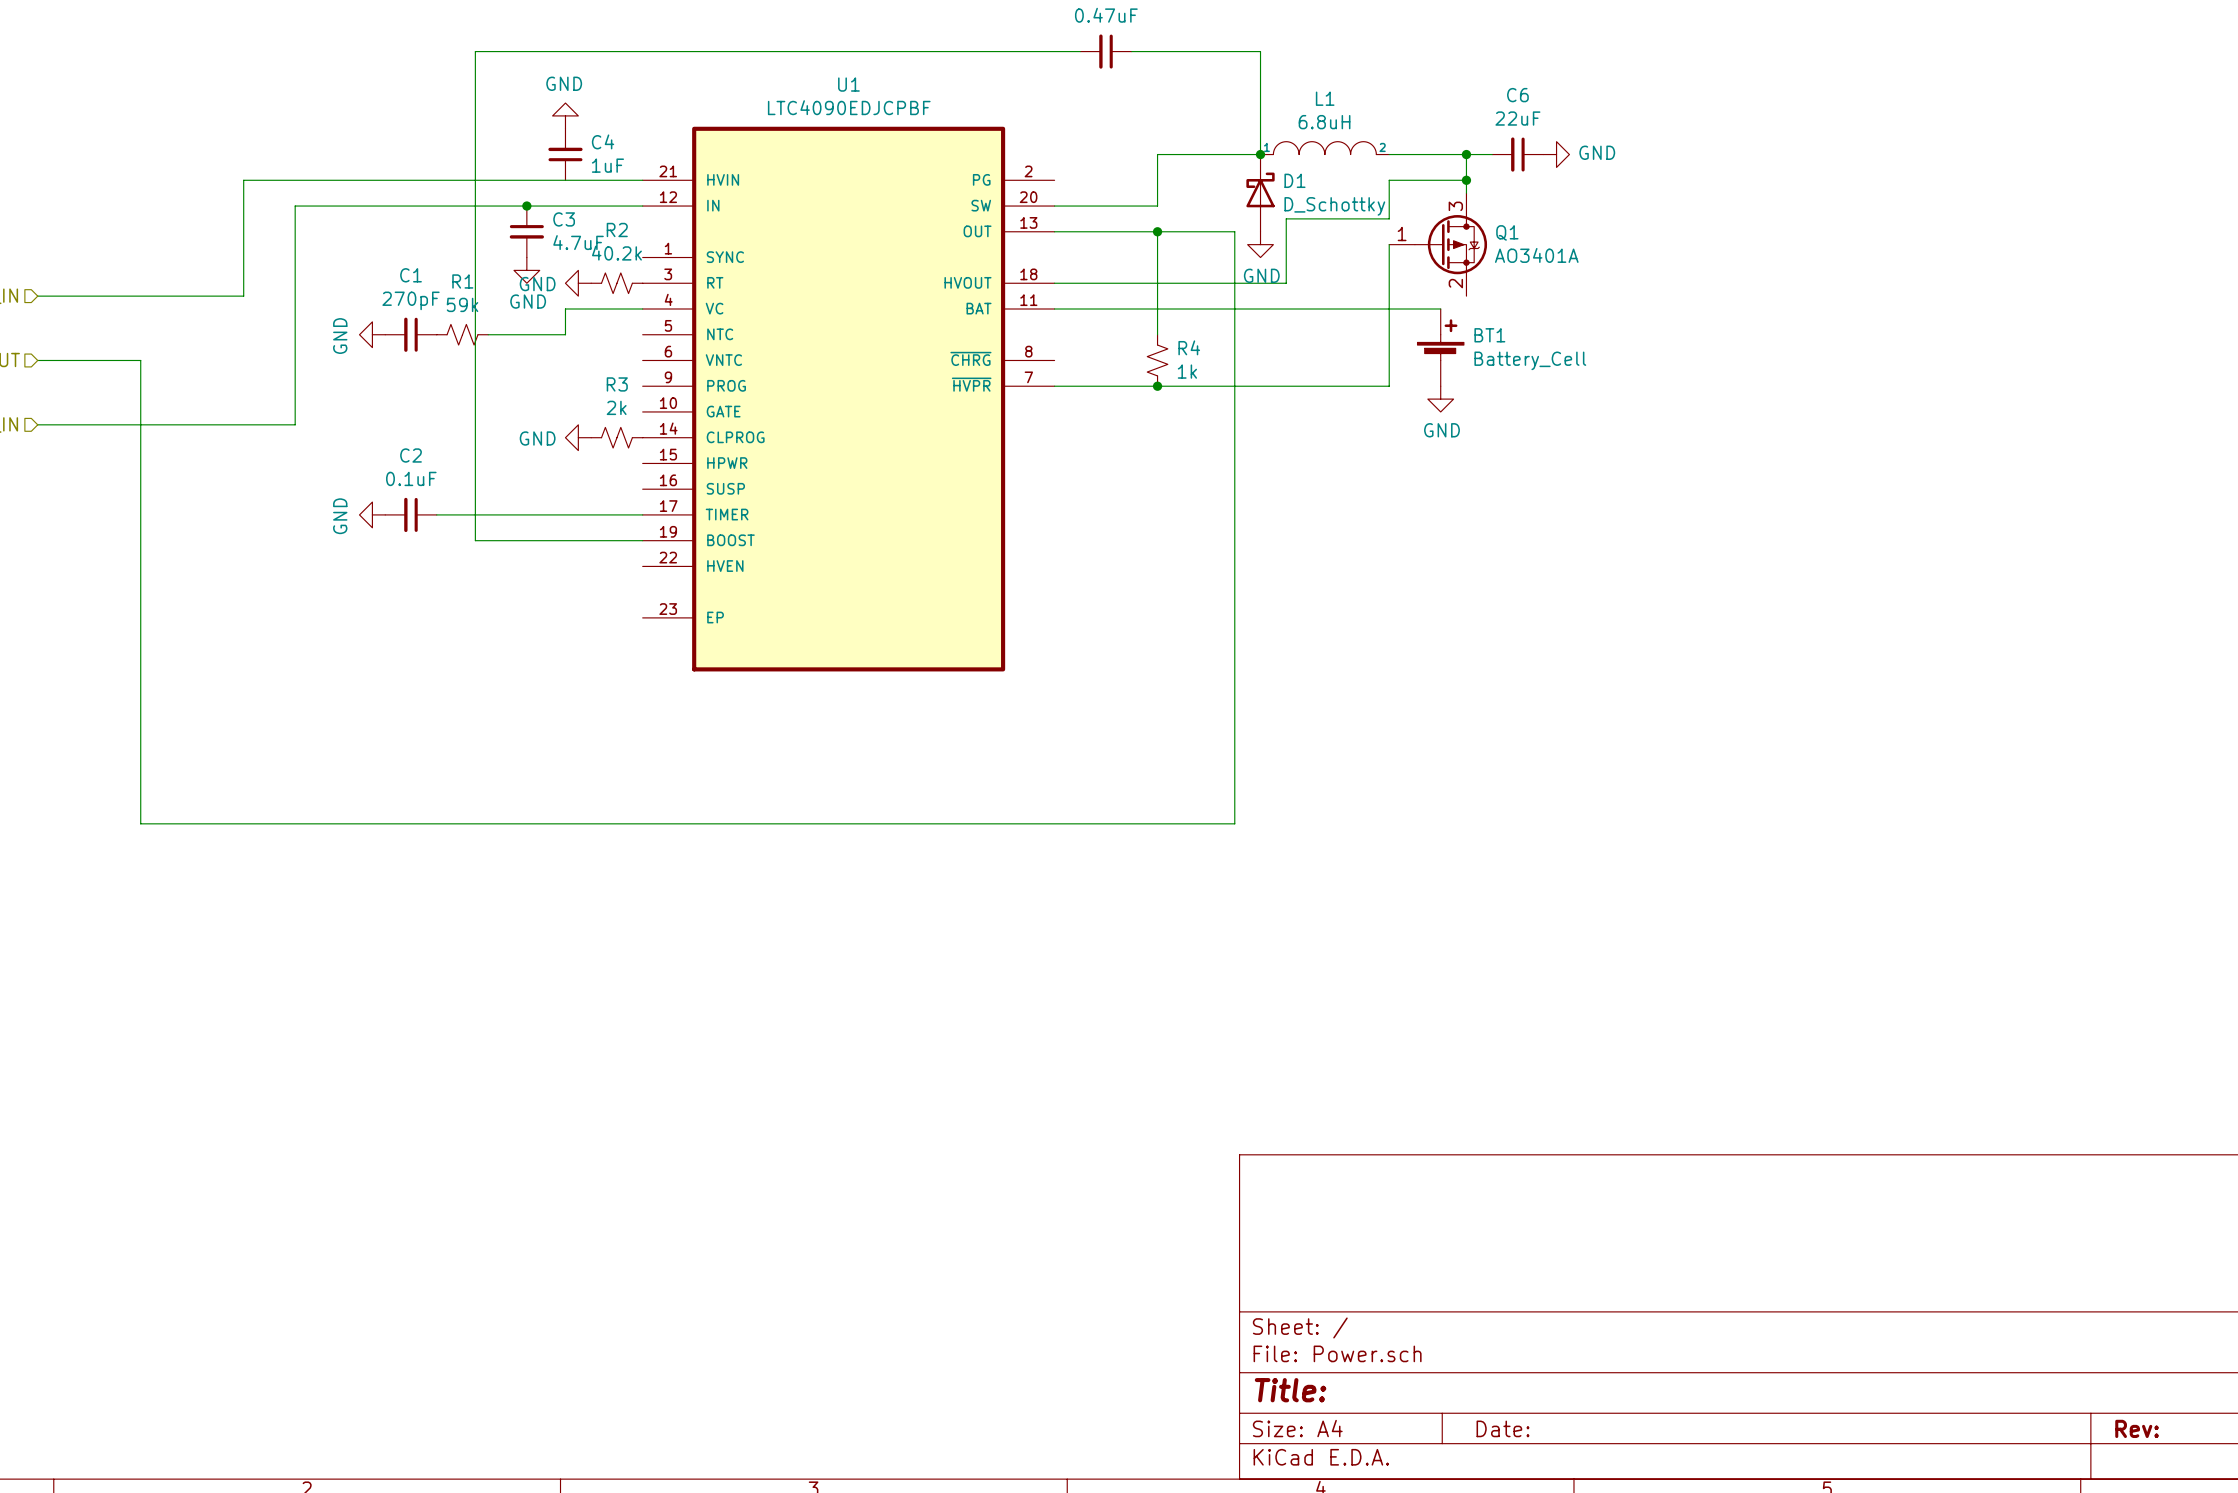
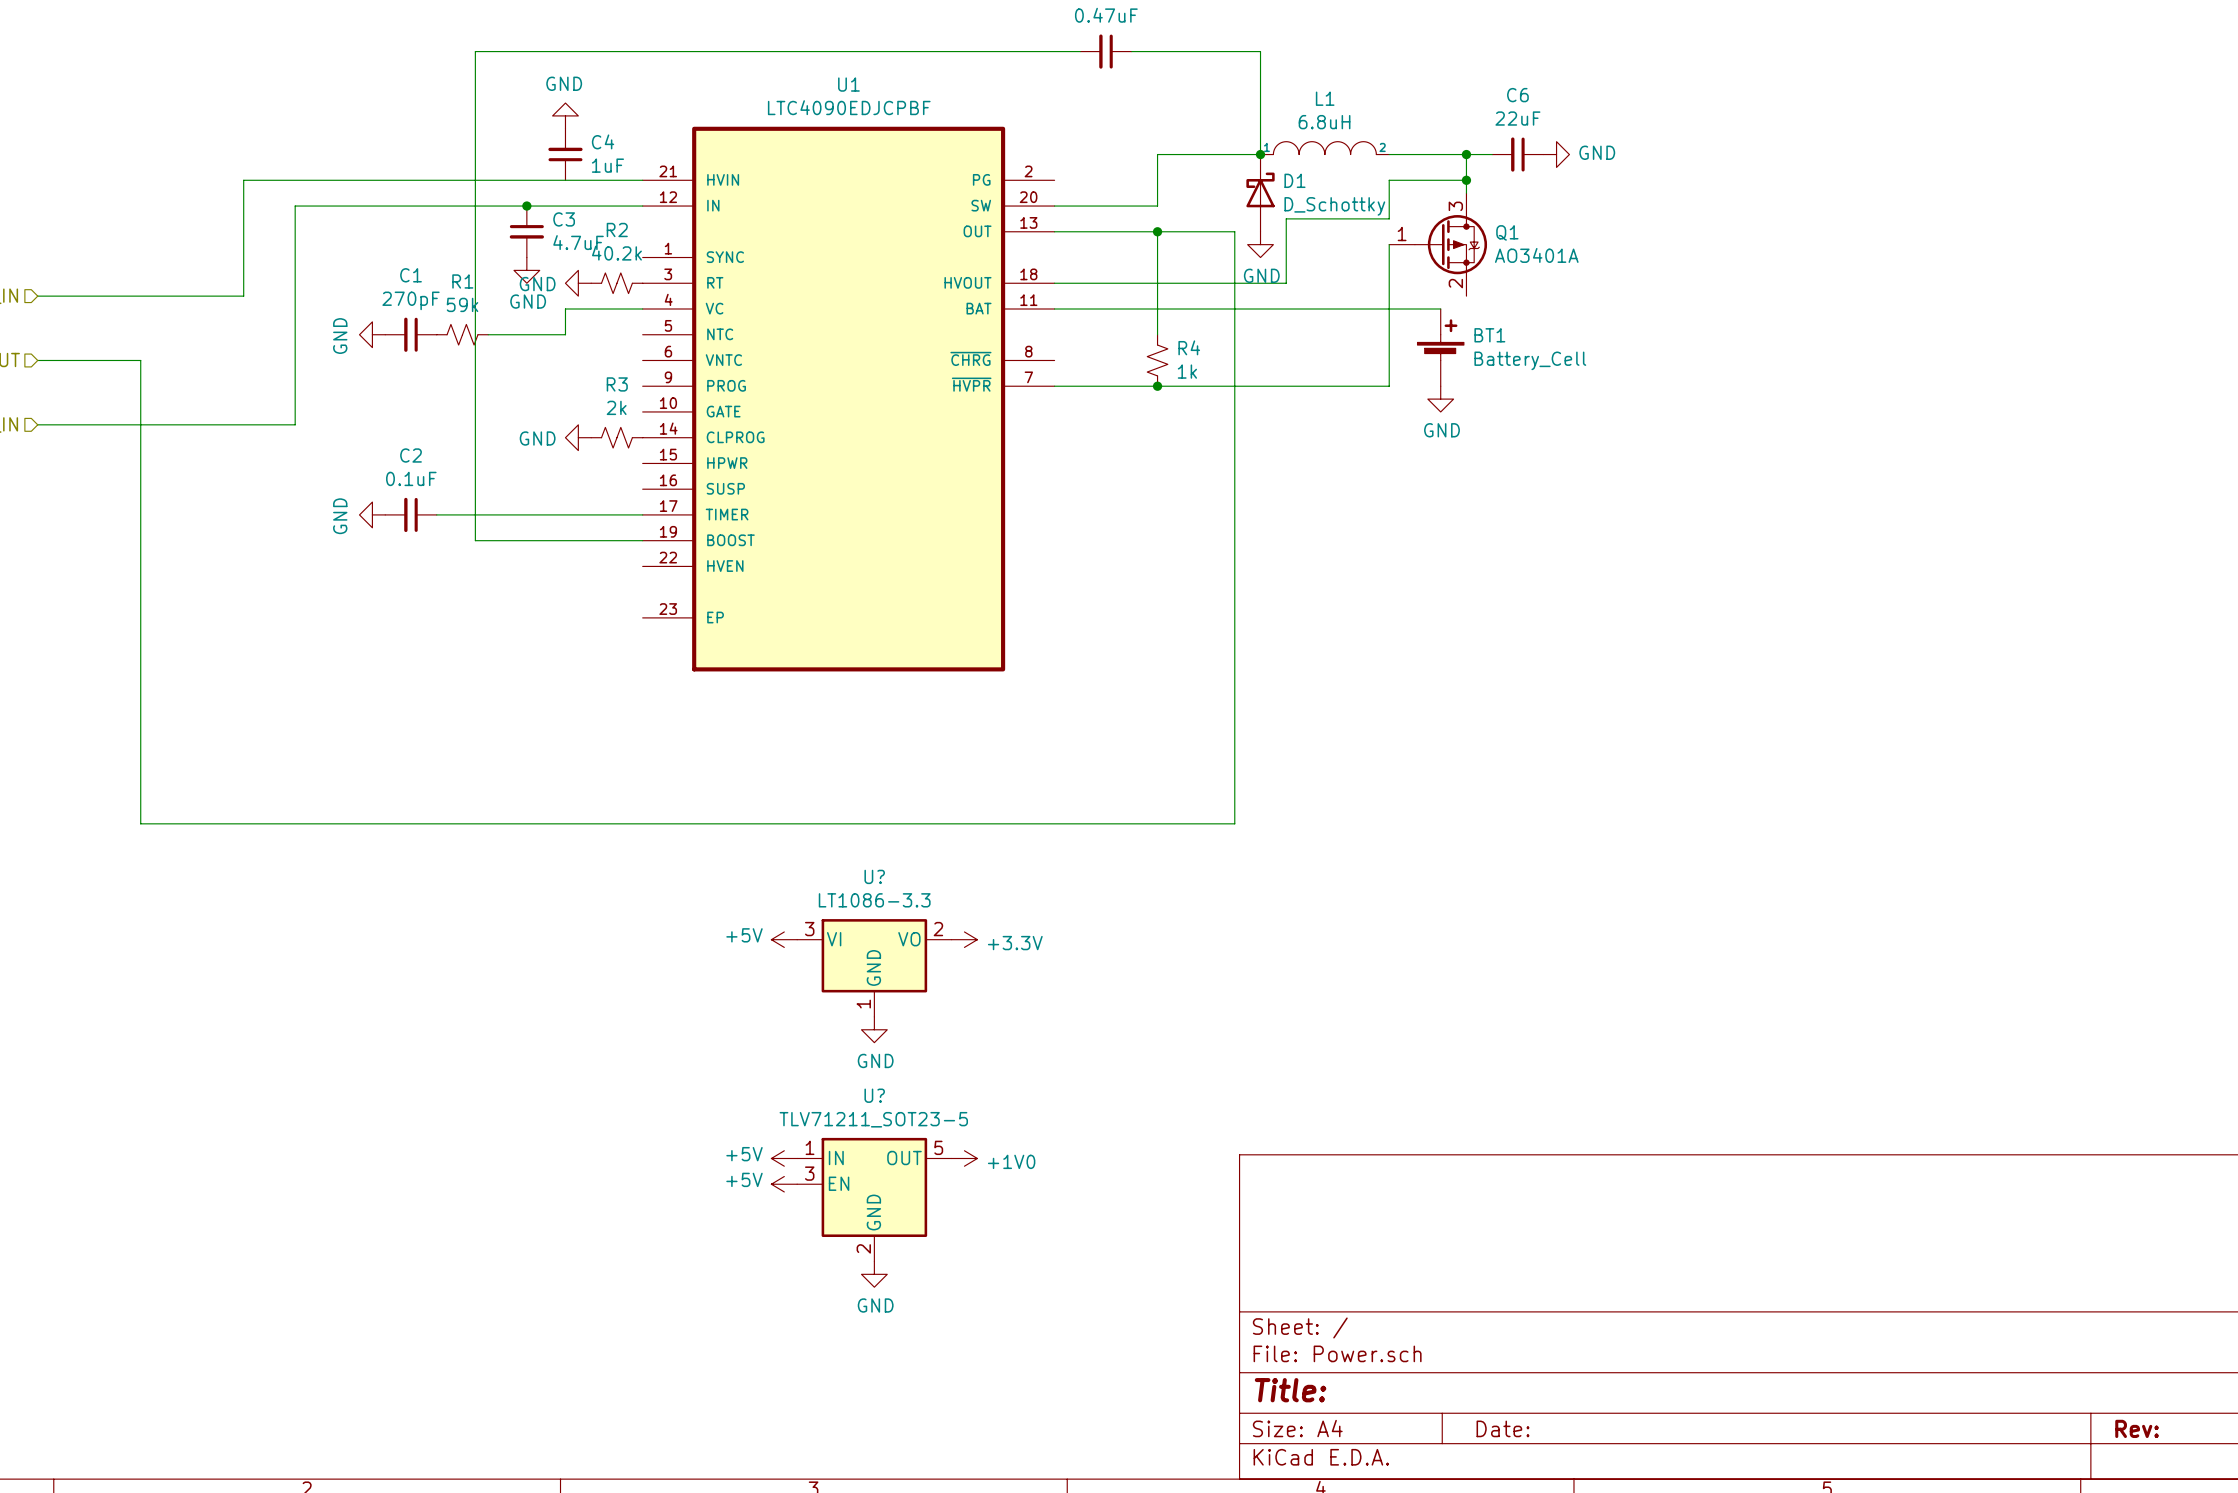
power symbol: none -> +5V (784, 939)
power symbol: none -> +3.3V (964, 939)
U?: none -> LT1086-3.3 (874, 968)
power symbol: none -> GND (874, 1029)
power symbol: none -> +5V (784, 1158)
power symbol: none -> +1V0 (964, 1158)
power symbol: none -> +5V (784, 1184)
U?: none -> TLV71211_SOT23-5 (874, 1199)
power symbol: none -> GND (874, 1274)

